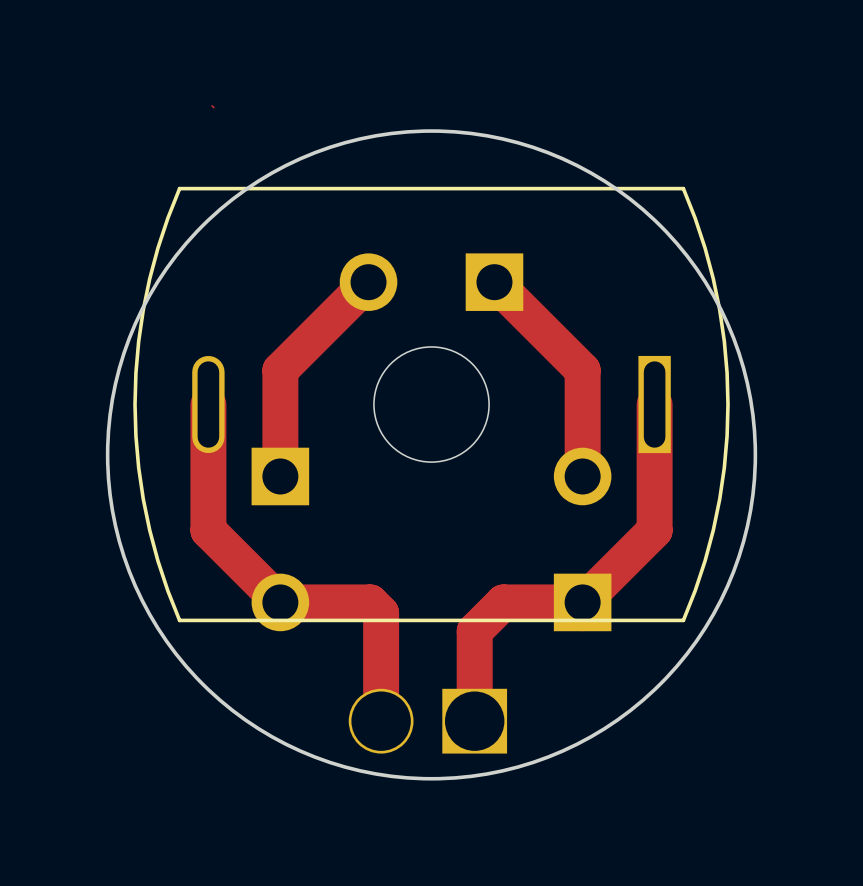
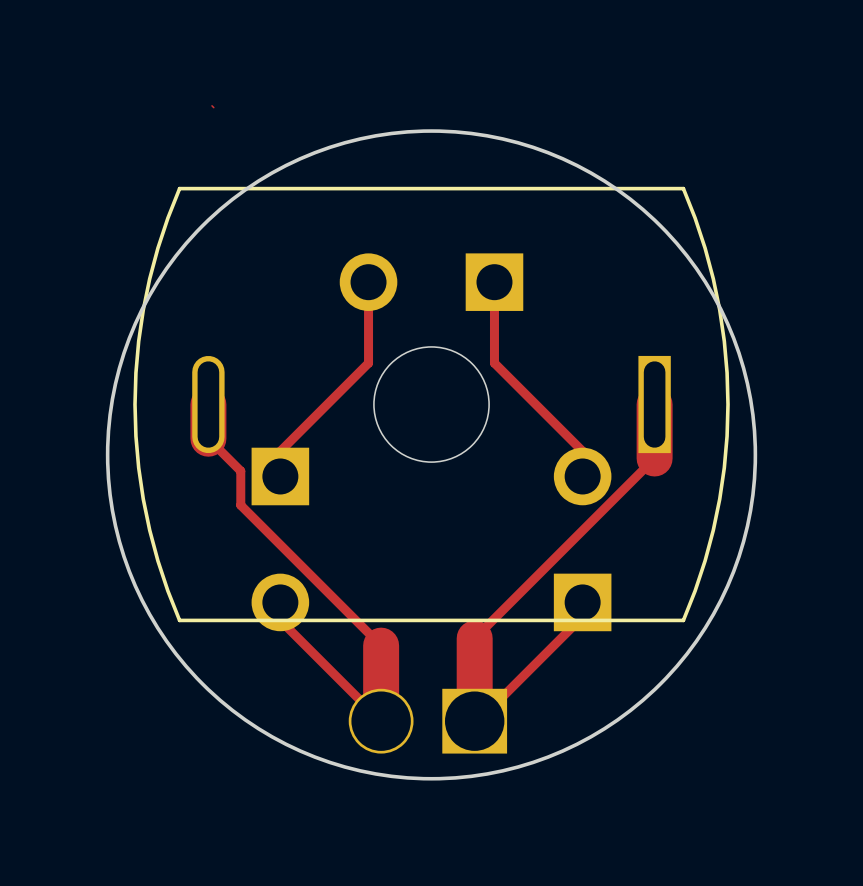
top track: (368, 282) (280, 370) (280, 451) -> (368, 282) (368, 363) (280, 451)
top track: (494, 282) (582, 370) (582, 451) -> (494, 282) (494, 363) (582, 451)
top track: (208, 438) (208, 530) (280, 602) (370, 602) (381, 613) (381, 645) -> (208, 438) (240, 471) (240, 505) (381, 645)
top track: (654, 458) (654, 530) (582, 602) (503, 602) (474, 631) (474, 638) -> (654, 458) (474, 638)
top track: none -> (280, 602) (280, 620) (381, 721)
top track: none -> (582, 613) (582, 616) (478, 721) (474, 721)

